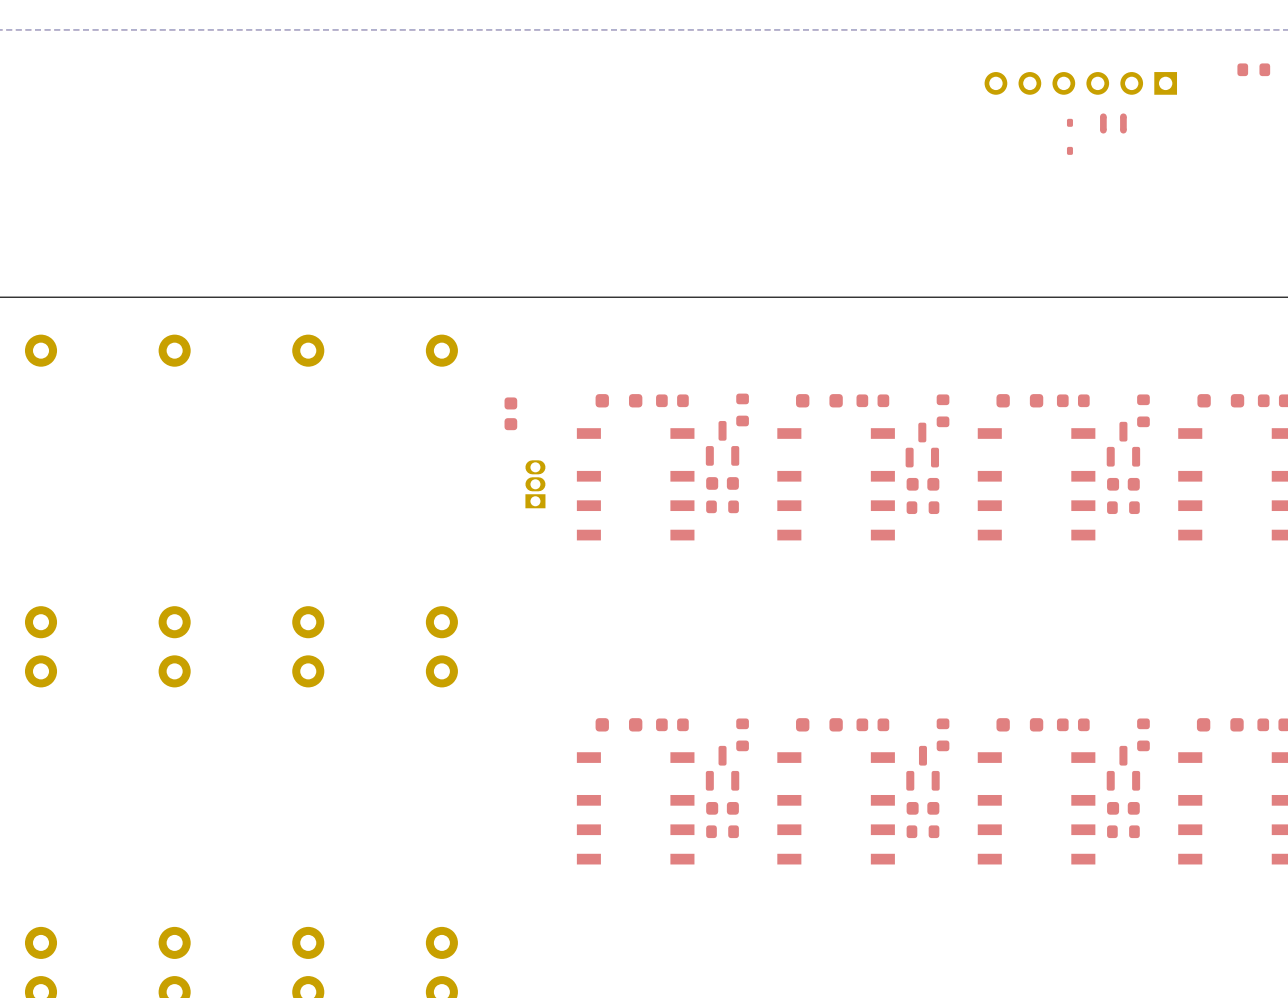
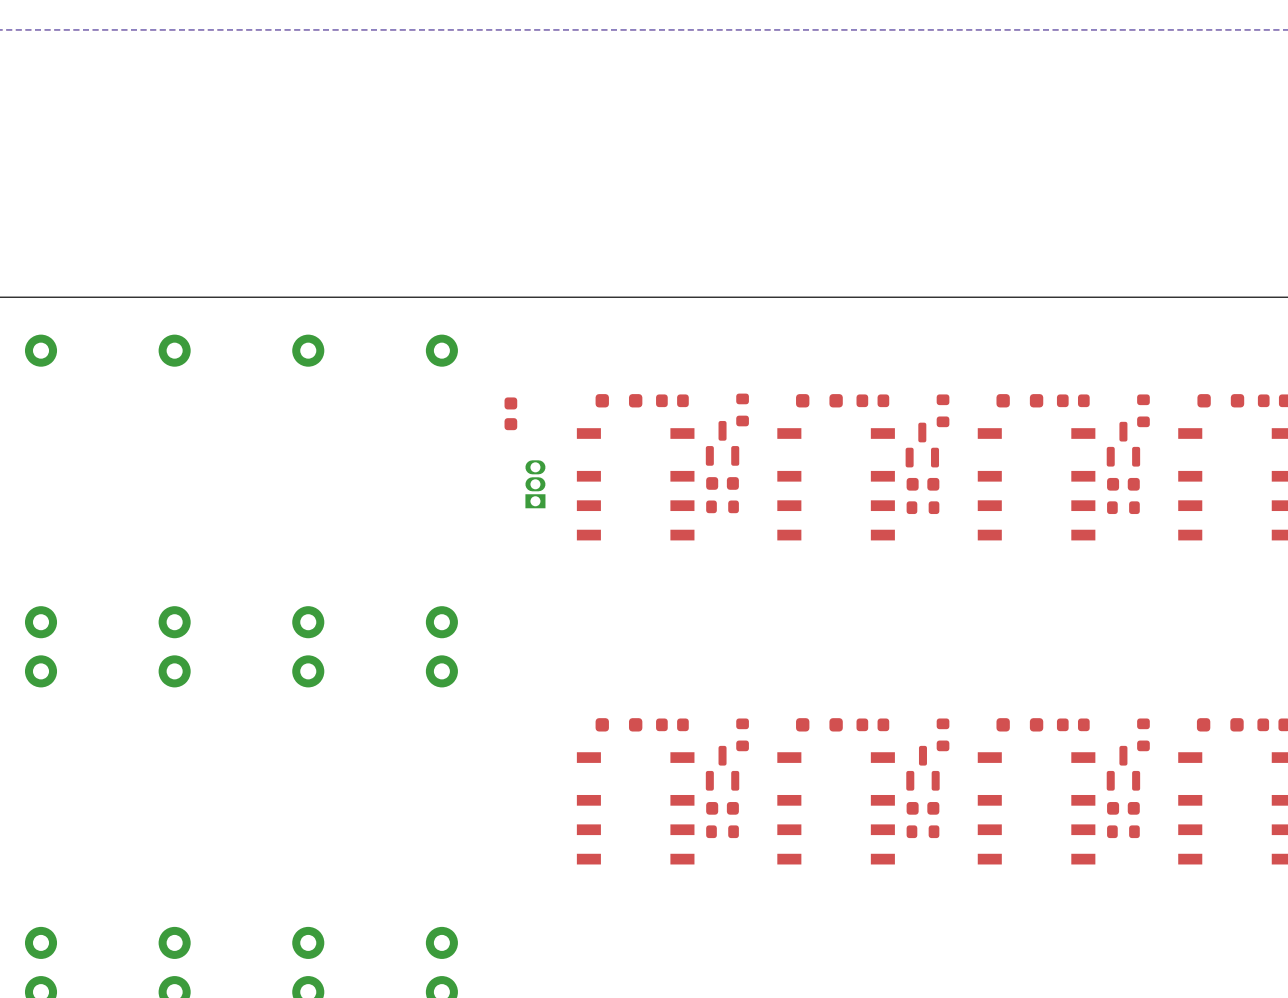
part: (1253, 69) -> none
part: (1080, 83) -> none
part: (1103, 123) -> none
part: (1123, 123) -> none
part: (1069, 136) -> none

